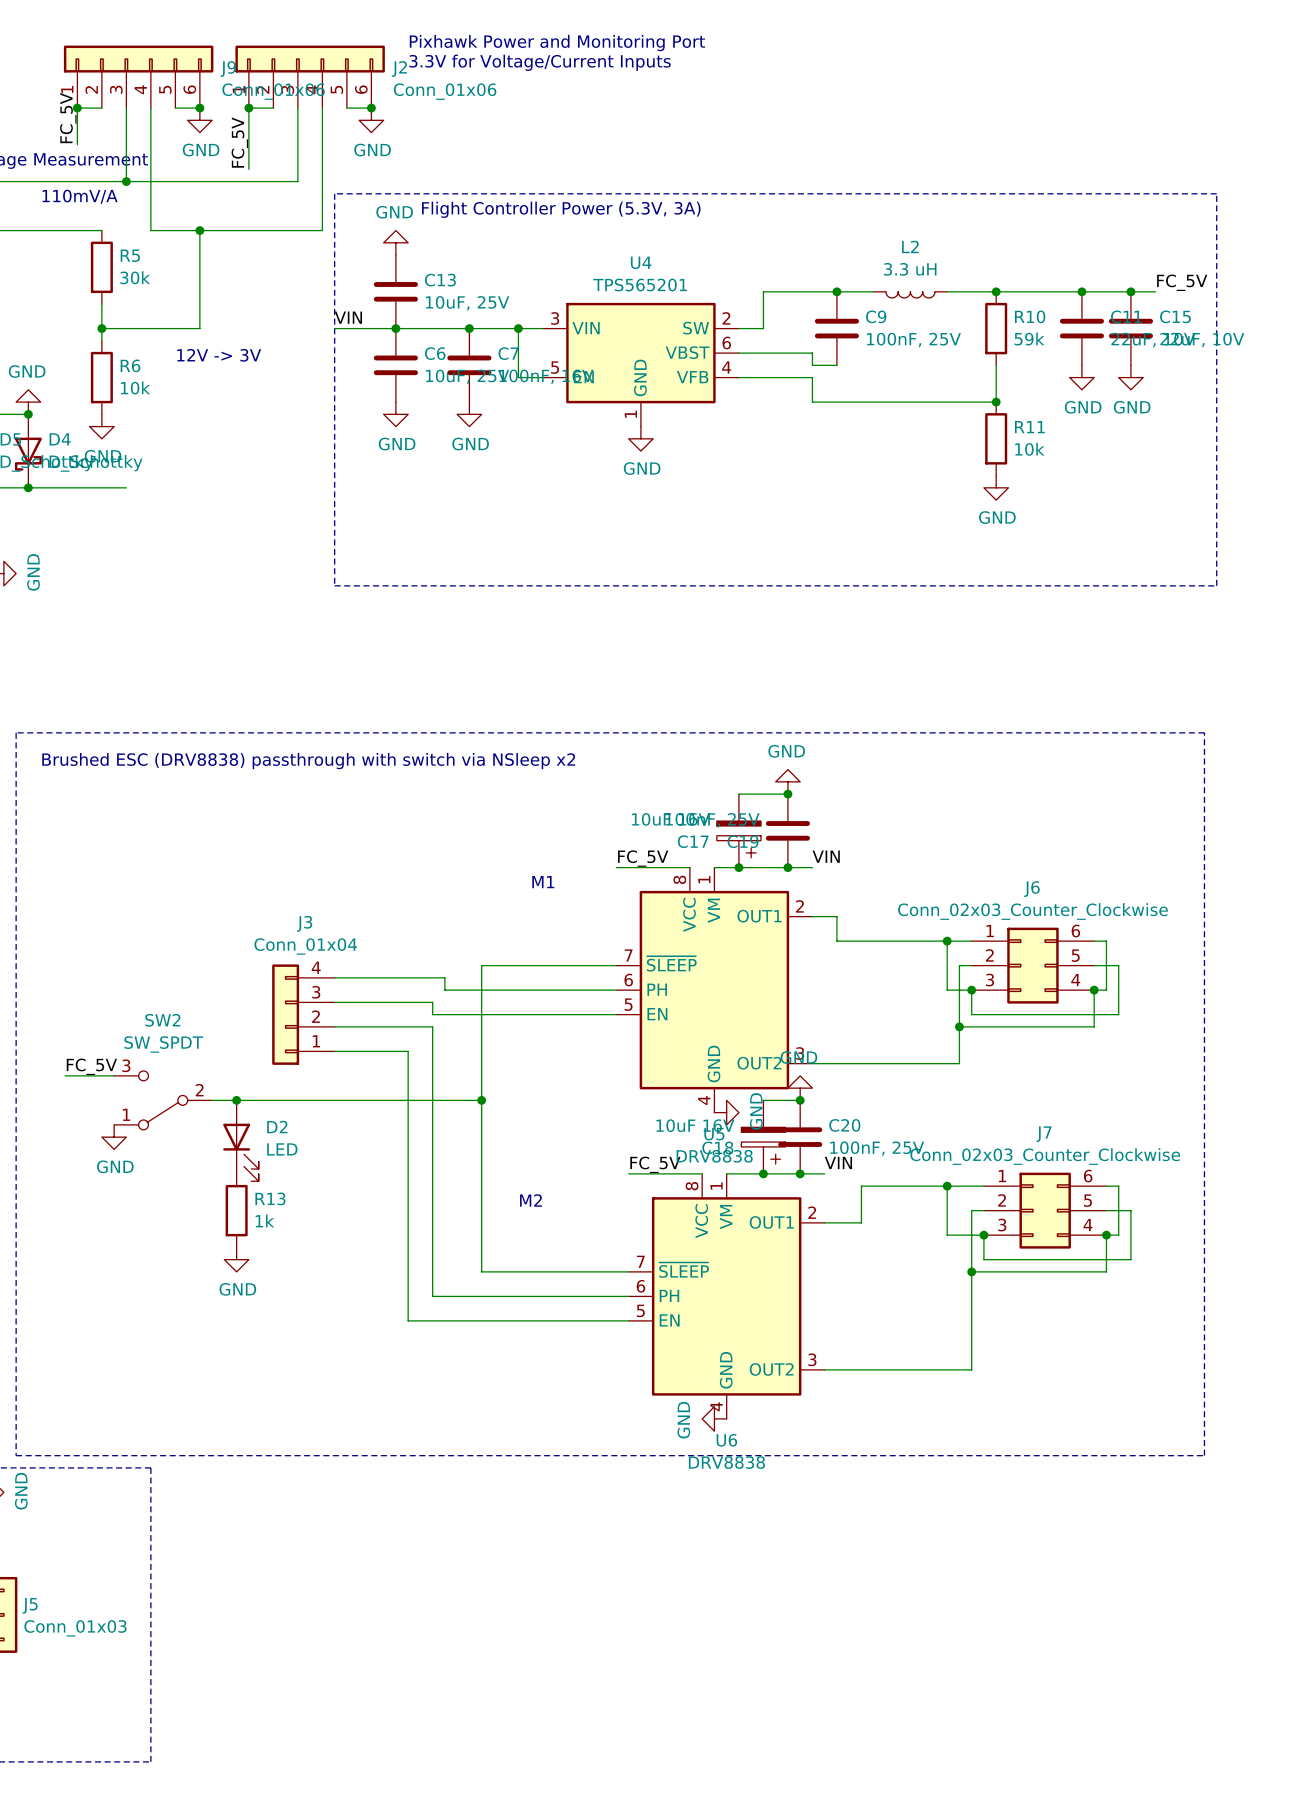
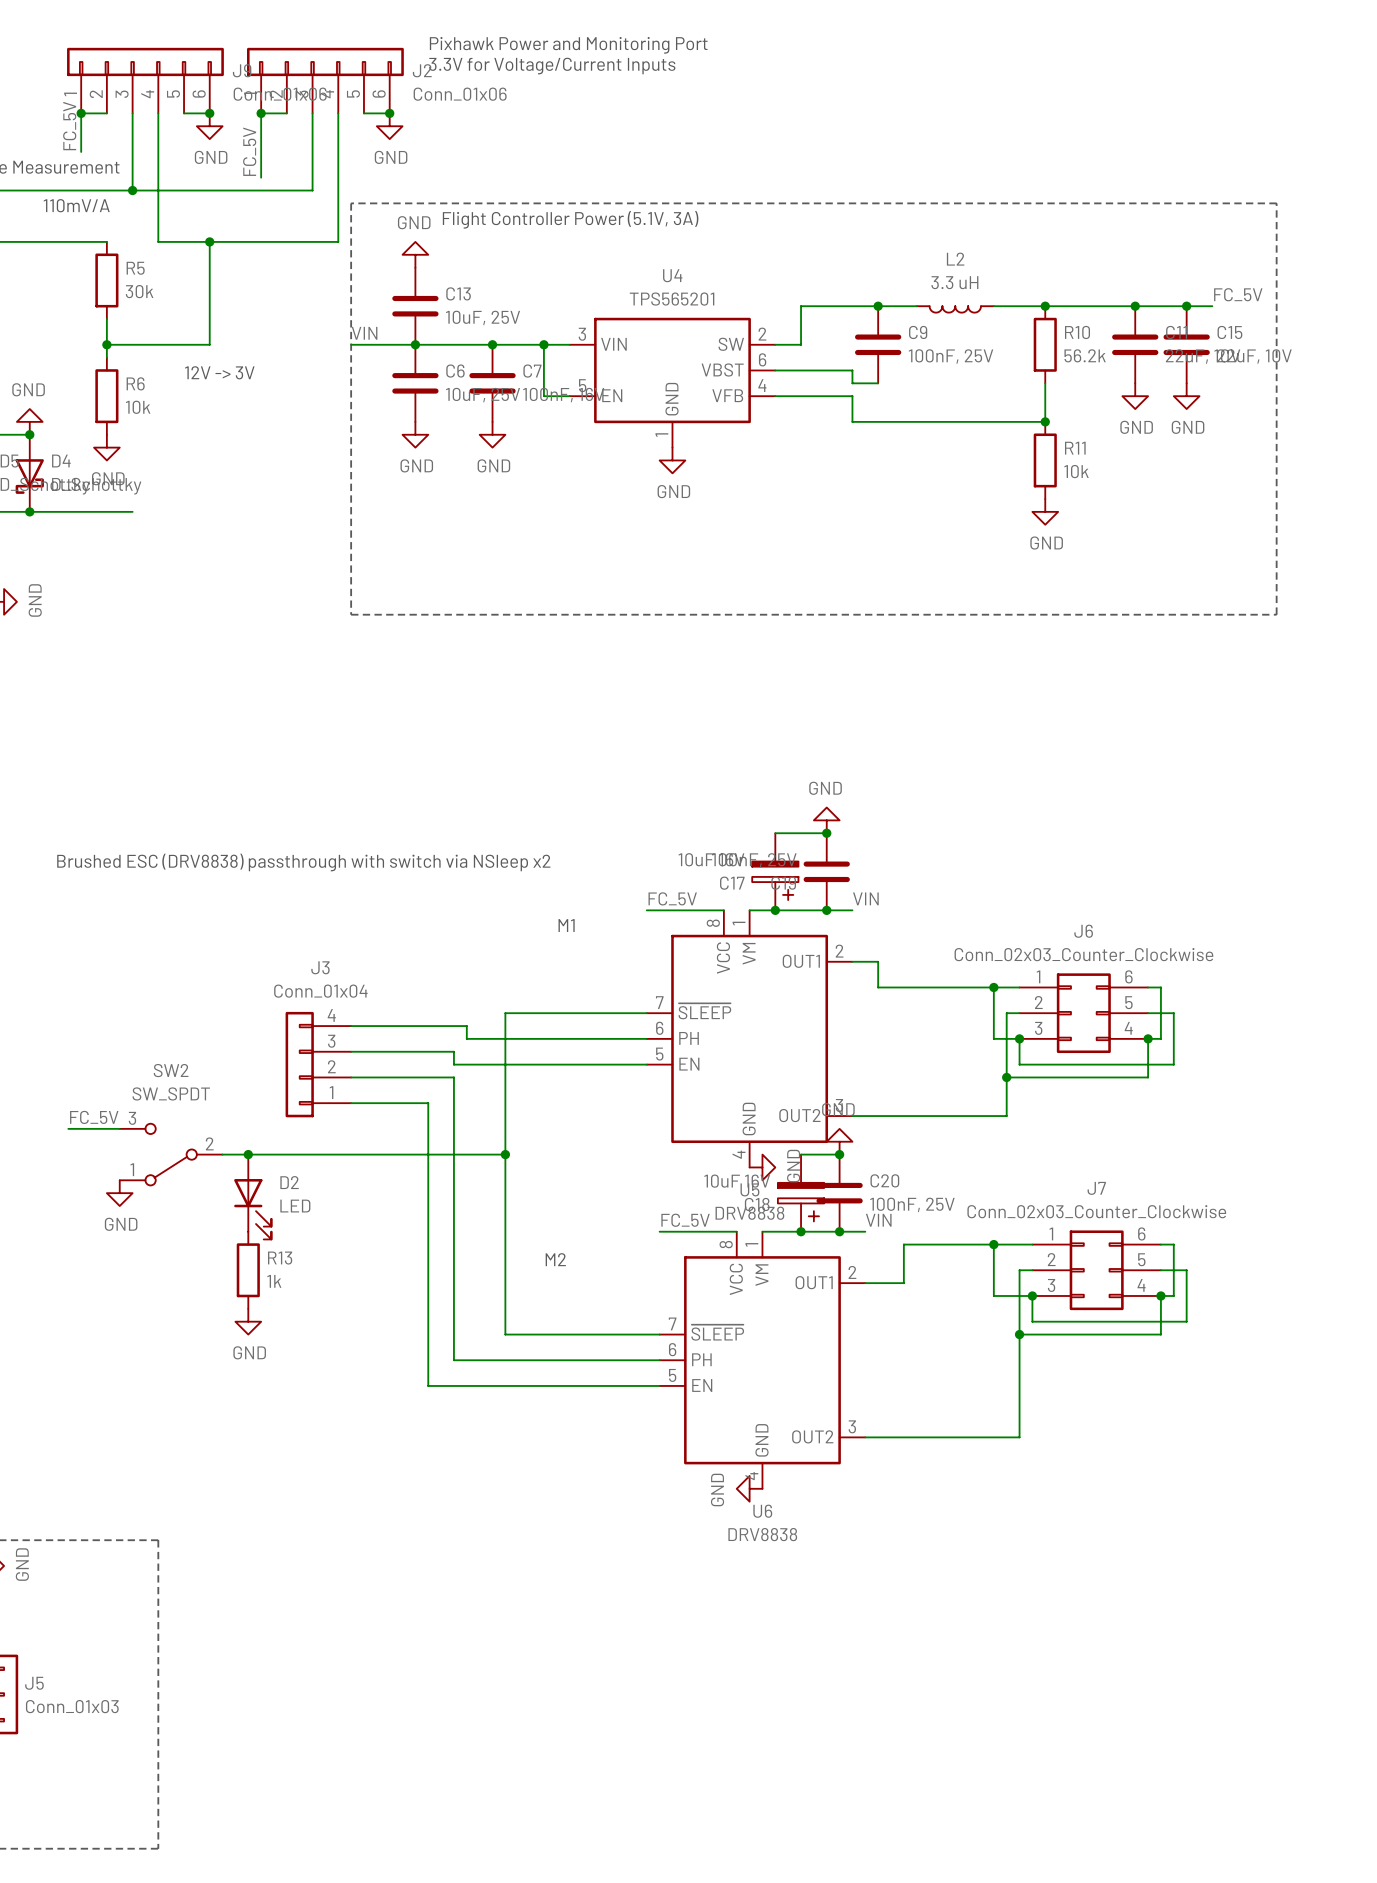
text: Flight Controller Power (5.3V, 3A) (561, 209) -> Flight Controller Power (5.1V, 3A) (570, 219)
R10 value: 59k (1029, 339) -> 56.2k (1085, 355)
line: (16, 732) (16, 1455) (1204, 1455) (1204, 732) (16, 732) -> none
text position: Brushed ESC (DRV8838) passthrough with switch via NSleep x2 (308, 761) -> Brushed ESC (DRV8838) passthrough with switch via NSleep x2 (303, 862)

